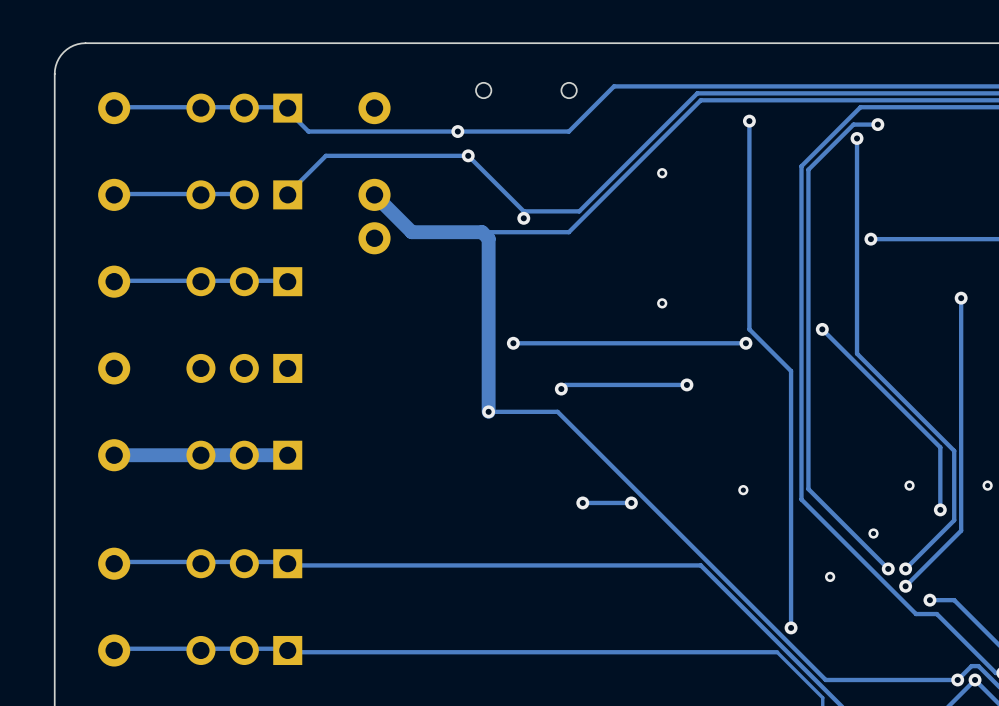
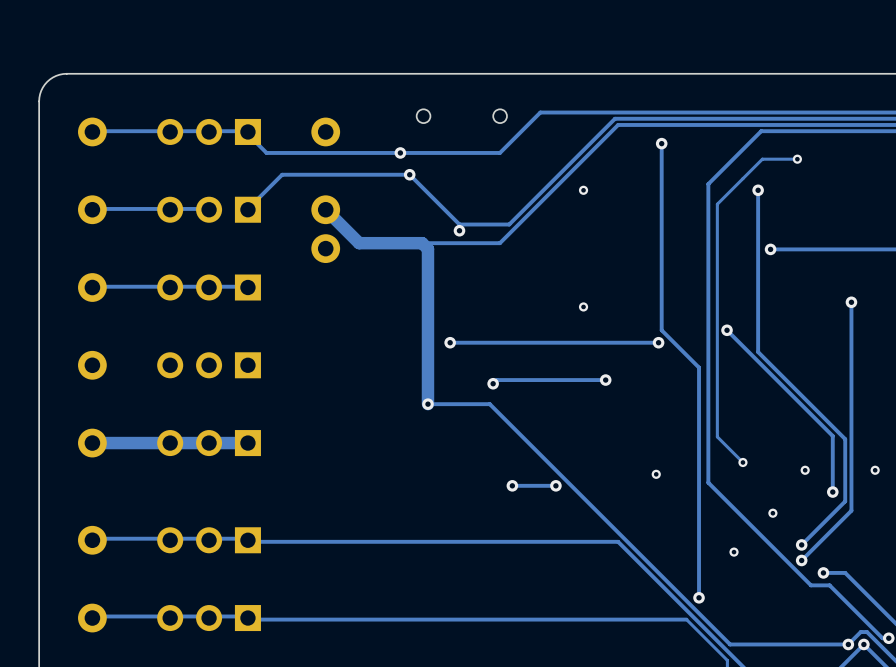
track: (877, 124) (853, 124) (808, 169) (808, 489) (888, 568) -> none
via: (877, 124) -> none
track: (857, 138) (857, 173) -> none
via: (857, 138) -> none
track: none -> (797, 159) (762, 159) (717, 204) (717, 436) (742, 462)
via: none -> (797, 159)
via: none -> (758, 190)
via: none -> (742, 462)
via: (888, 568) -> none

